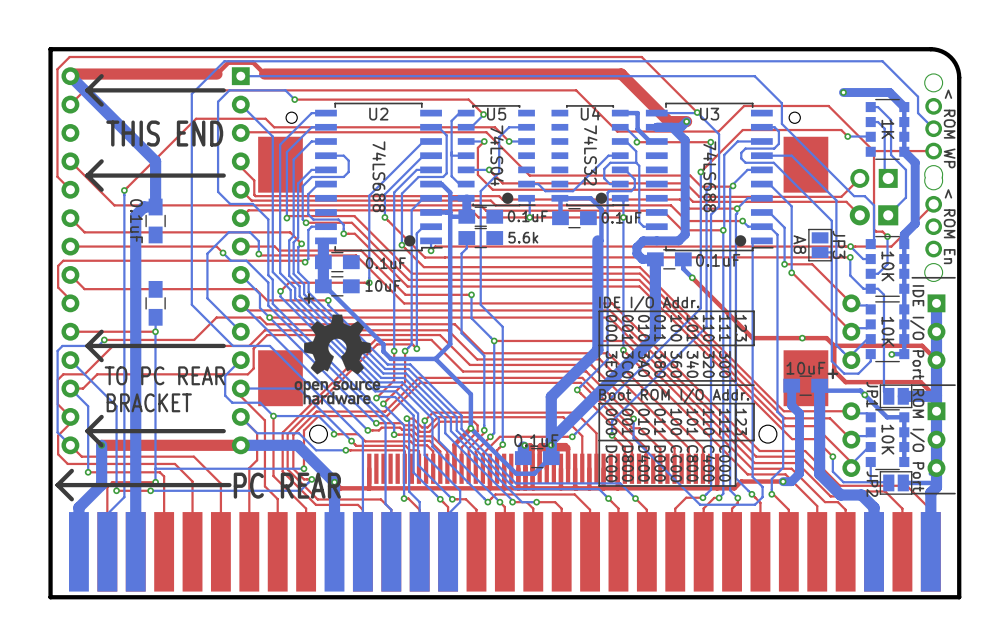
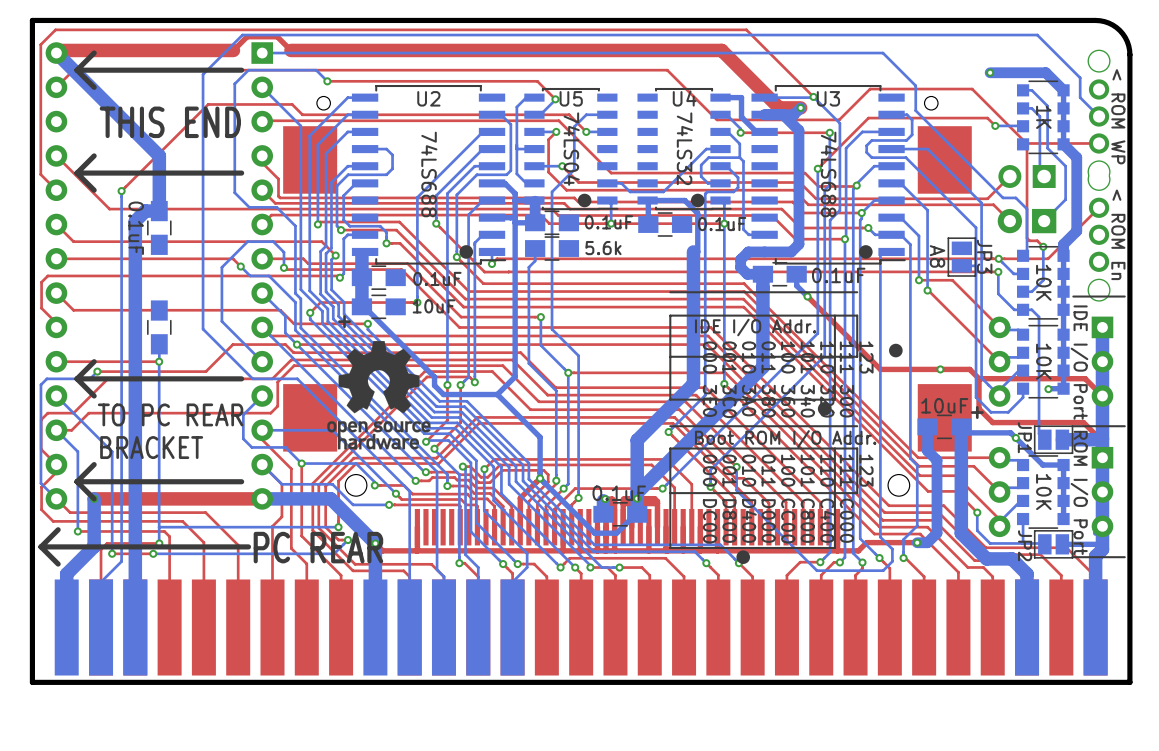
line: none -> (857, 292) (670, 292)
line: (735, 311) (735, 380) (599, 380) (599, 311) (754, 311) (754, 345) (599, 345) -> (834, 315) (834, 399) (670, 399) (670, 315) (857, 315) (857, 356) (670, 356)
drawing: none -> [889, 343, 903, 358]
drawing: none -> [817, 402, 832, 416]
line: (754, 385) (733, 385) -> (695, 426) (670, 426)
line: (599, 403) (599, 485) -> (695, 448) (670, 448) (670, 547) (695, 547)
line: (733, 403) (754, 403) (754, 440) (733, 440) -> (857, 448) (857, 493)
line: (735, 403) (735, 485) (714, 485) -> (834, 448) (834, 547)
line: none -> (695, 493) (670, 493)
drawing: none -> [736, 550, 751, 564]

